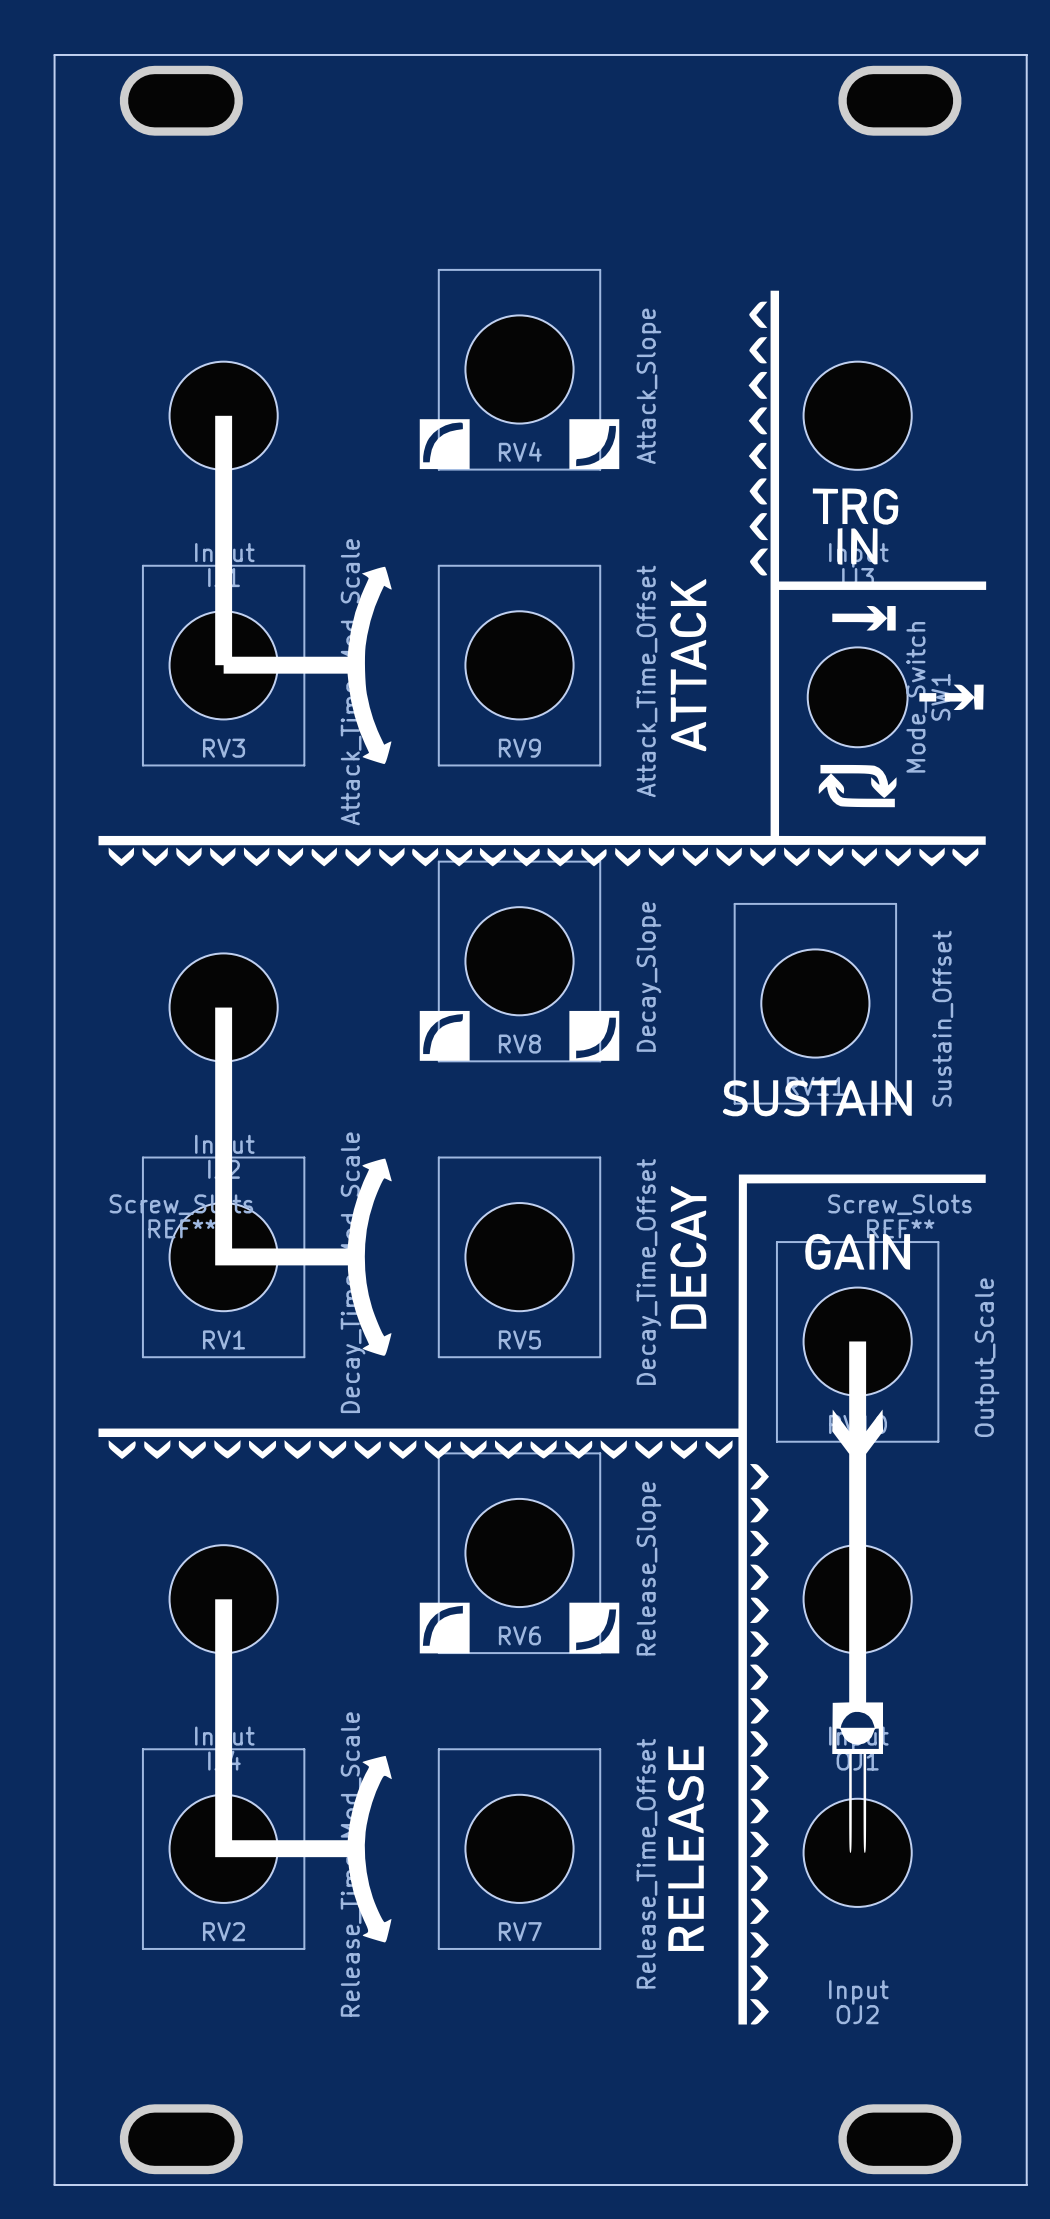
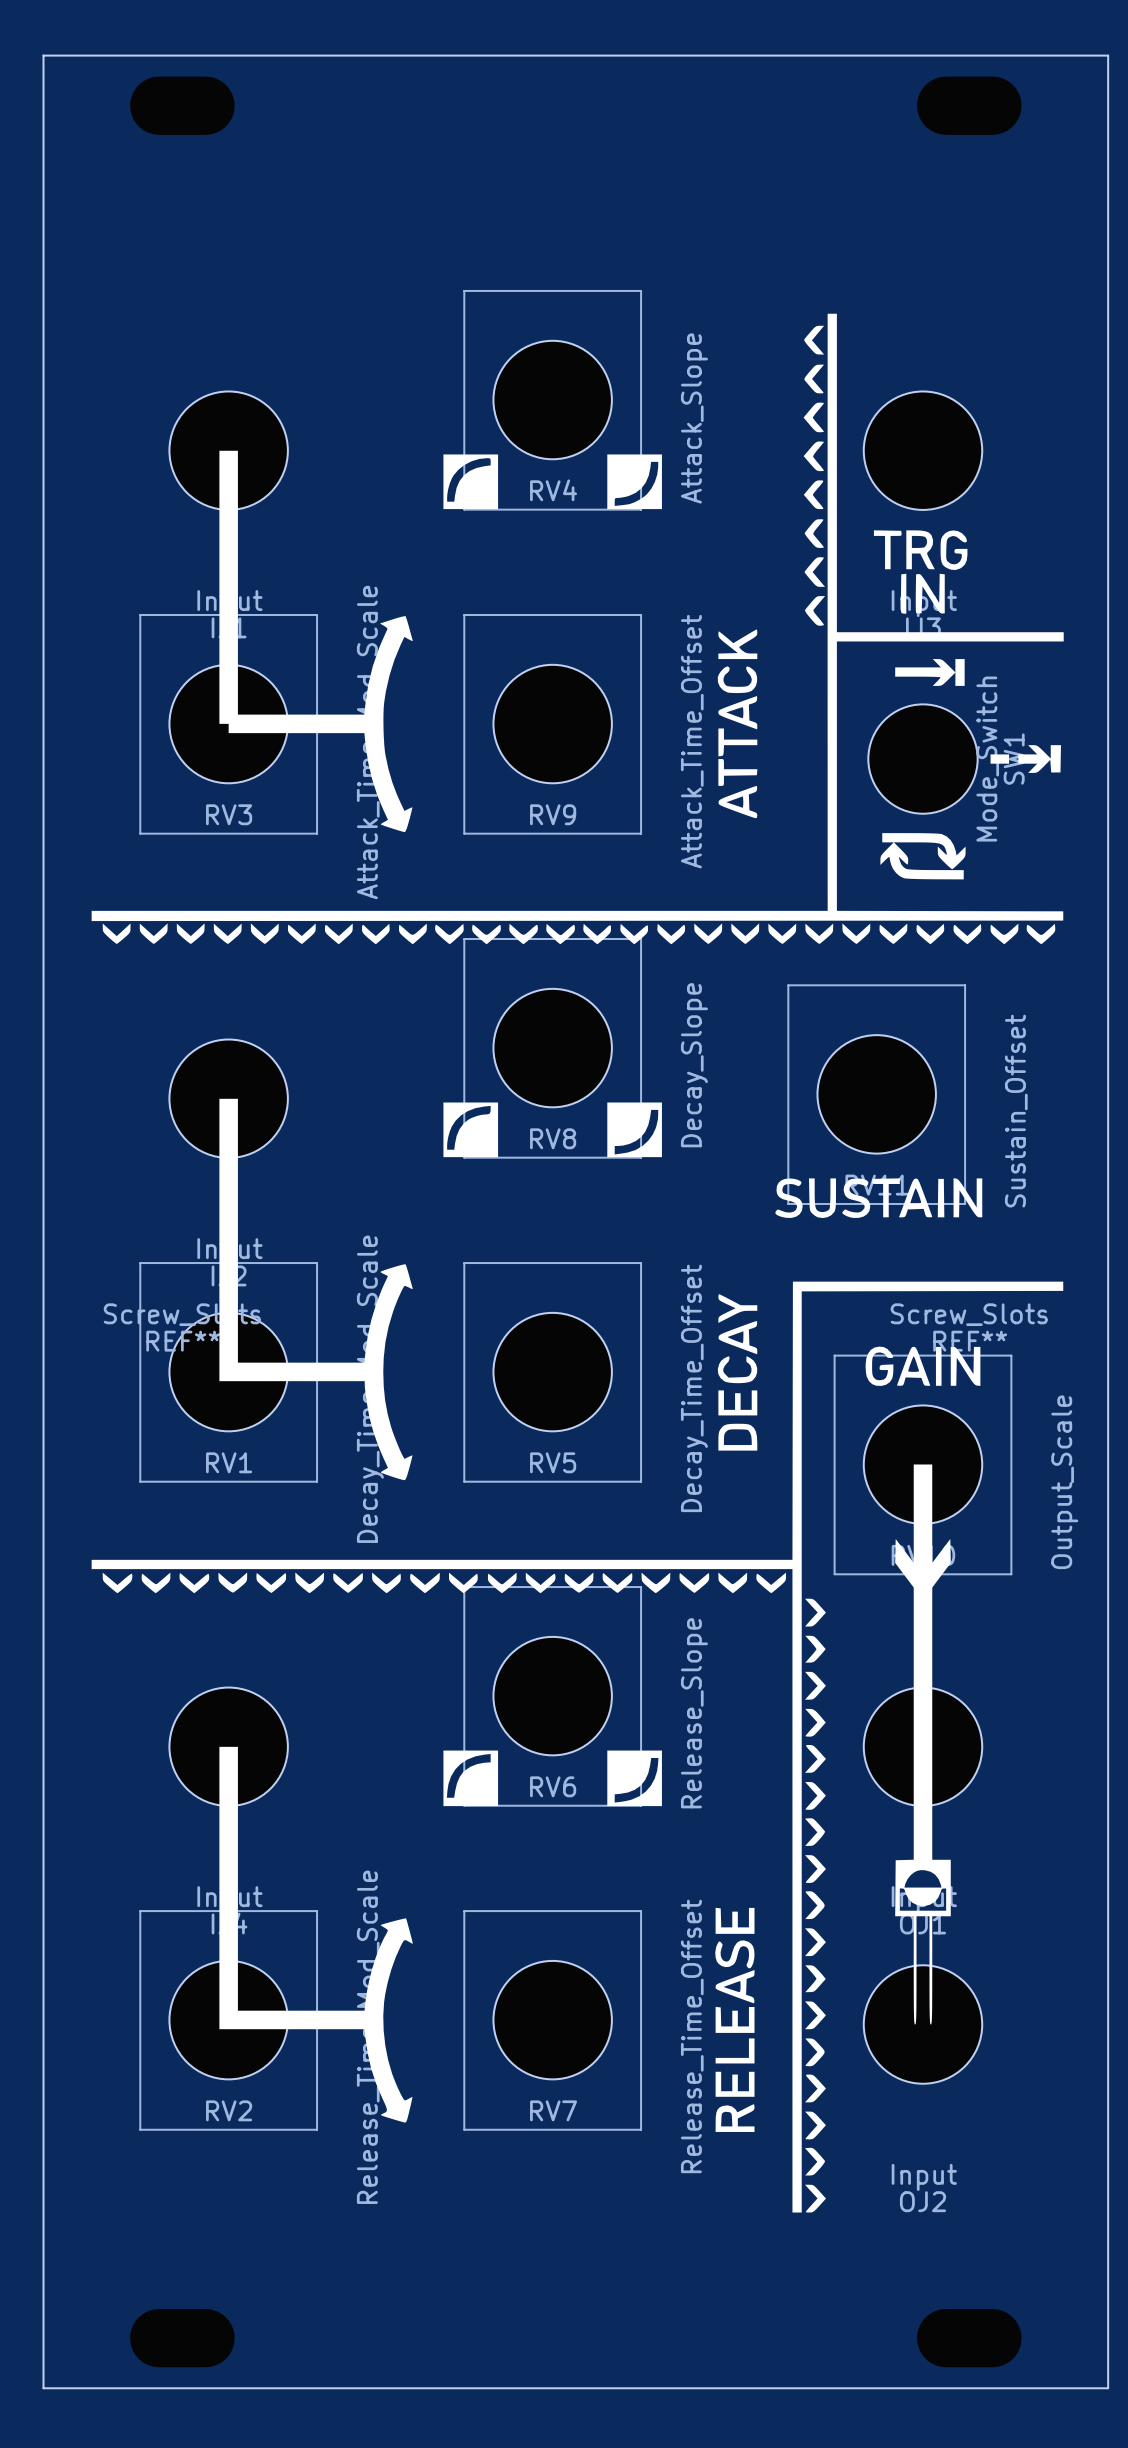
REF** footprint: [119, 65, 243, 2175] -> [130, 76, 235, 2368]
REF** footprint: [838, 65, 962, 2175] -> [916, 76, 1022, 2368]

